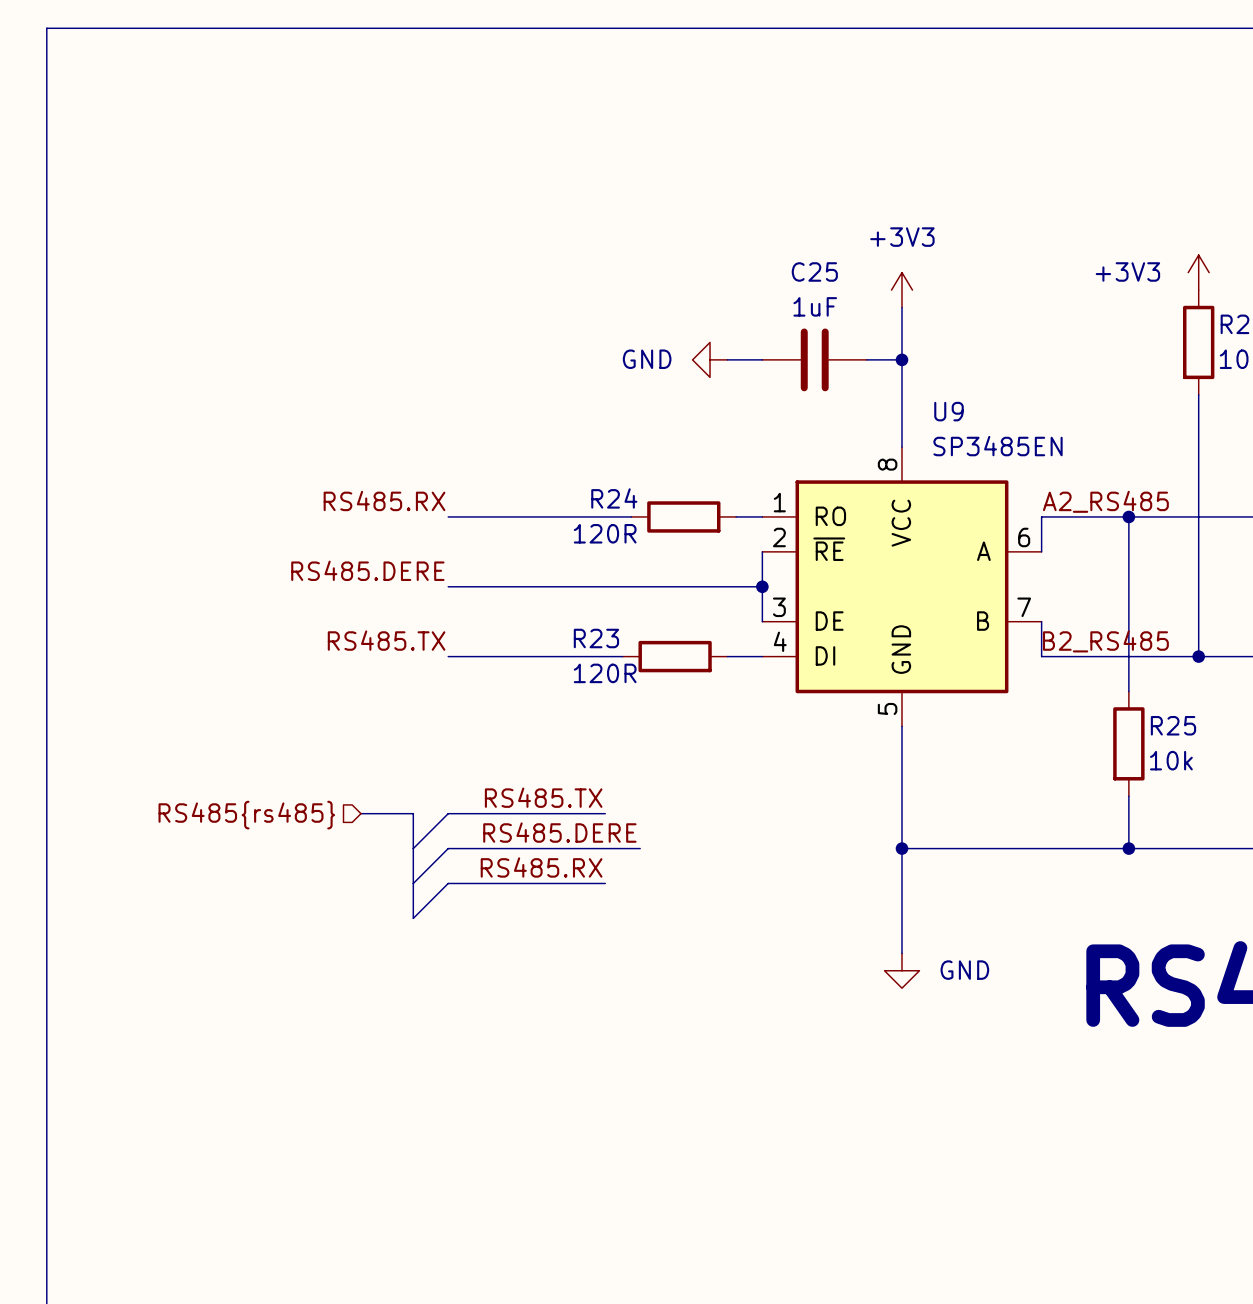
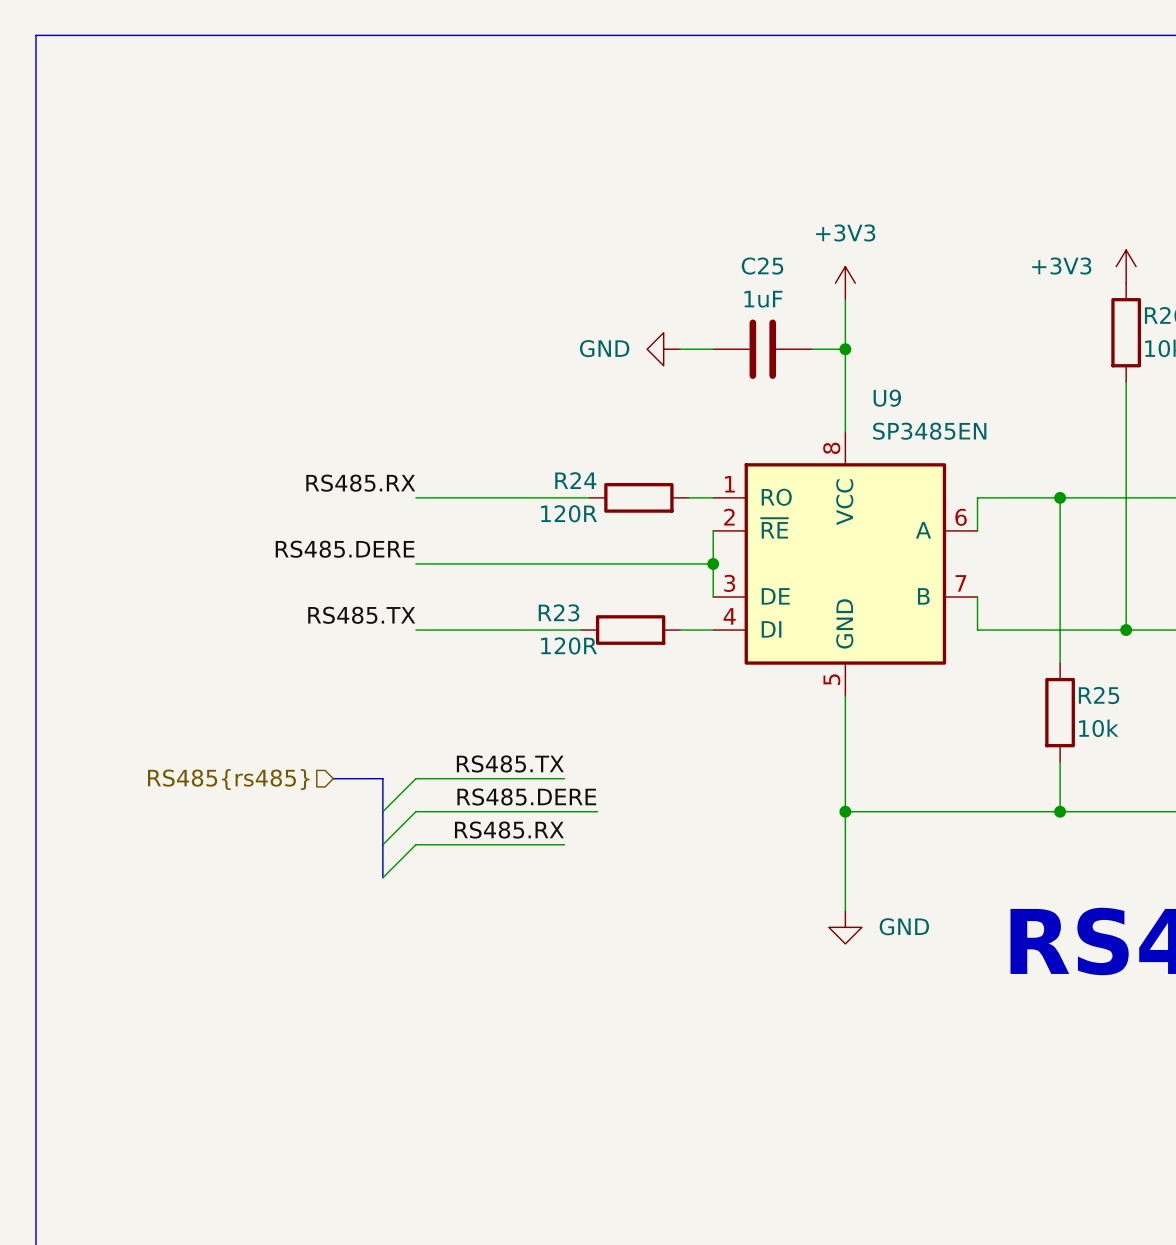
label: A2_RS485 (1105, 501) -> none
label: B2_RS485 (1105, 641) -> none

